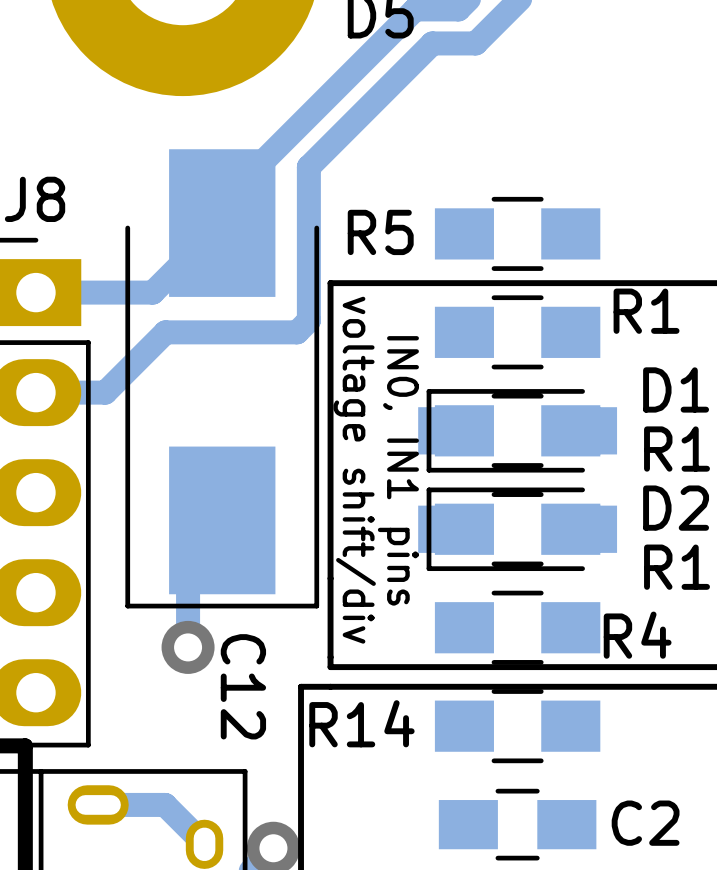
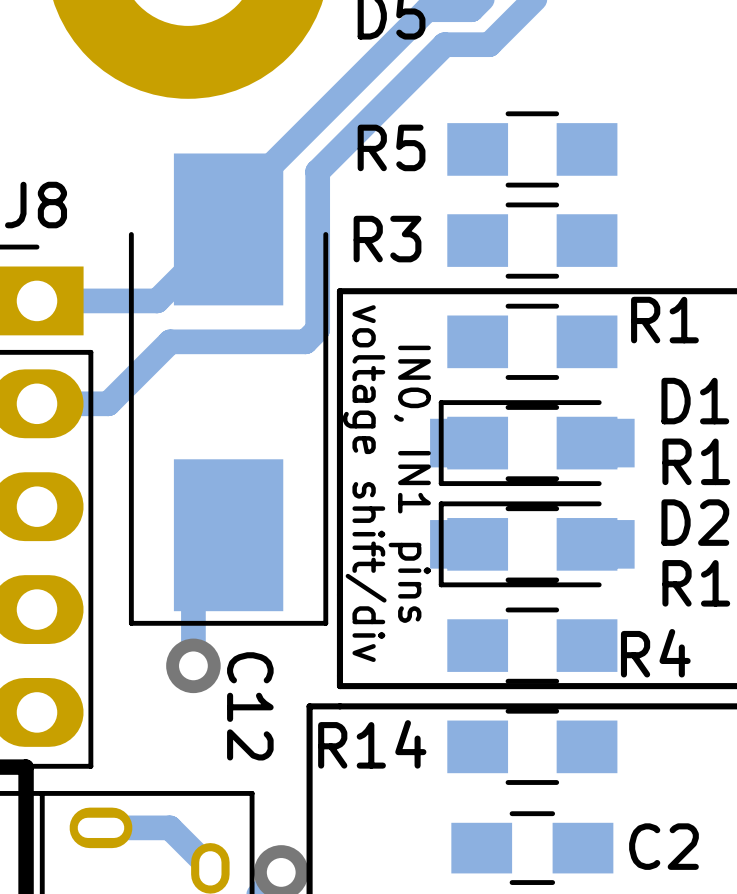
R5: none -> (532, 149)
R5 name: R5 (380, 232) -> R3 (387, 239)

